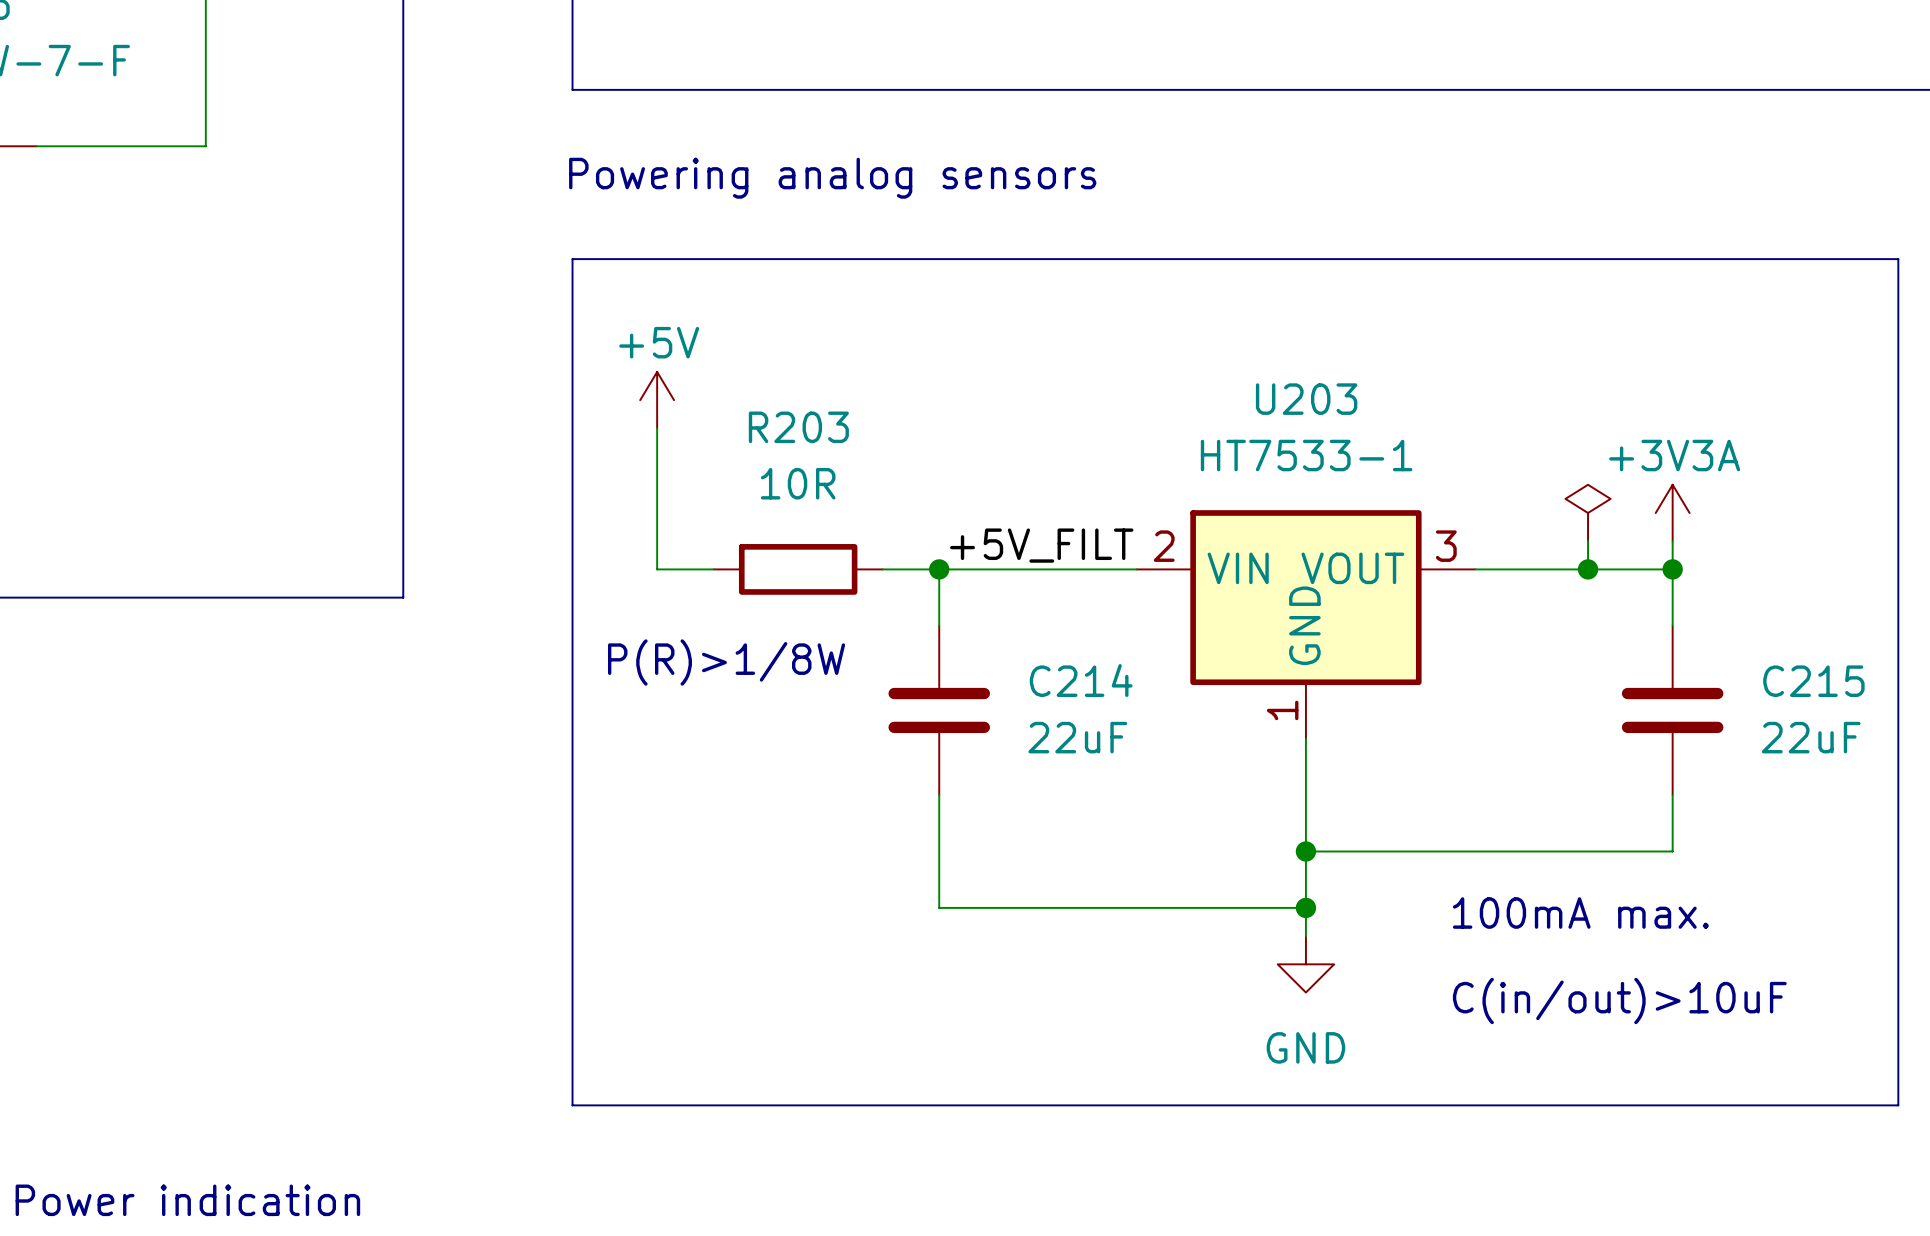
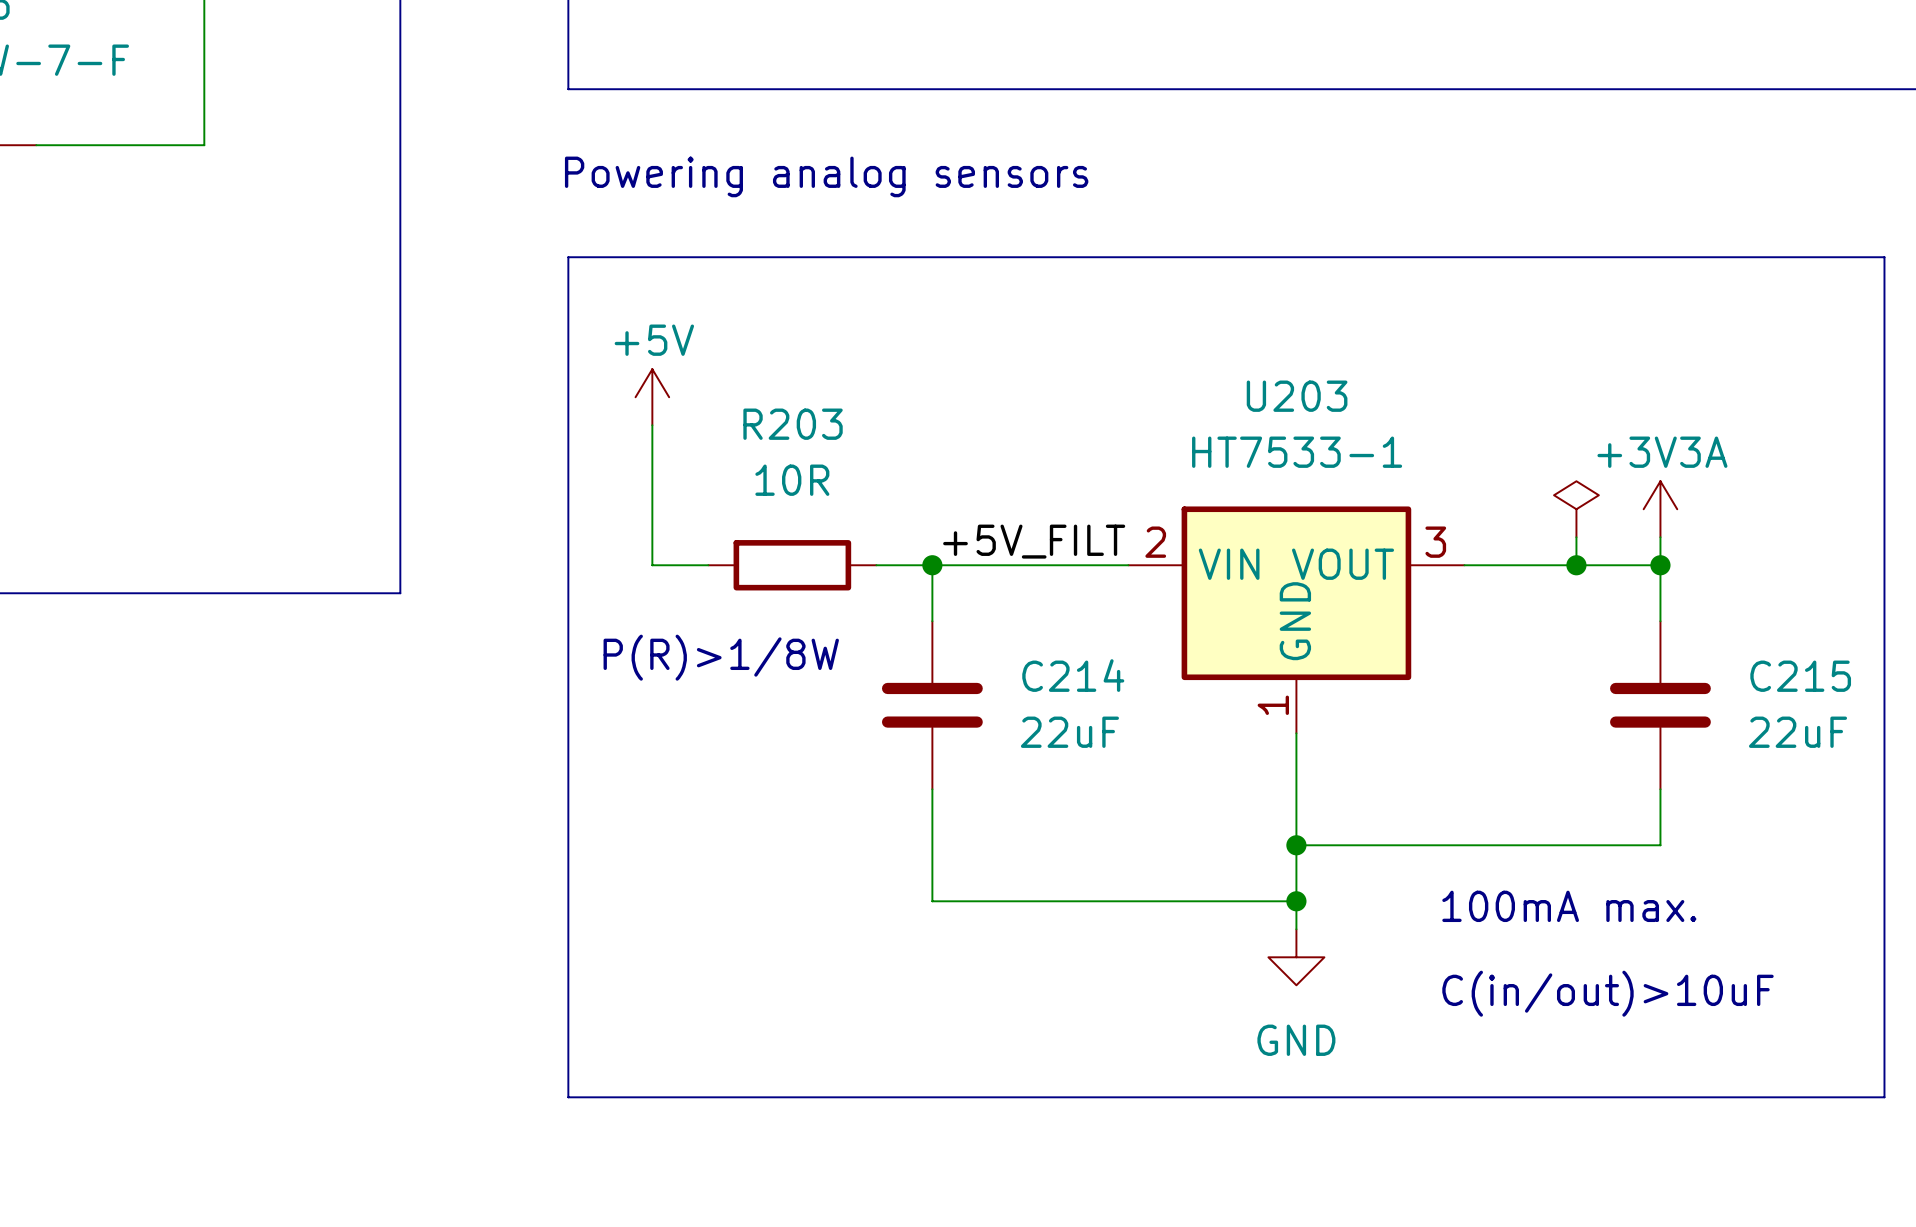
text: Power indication (187, 1200) -> none

